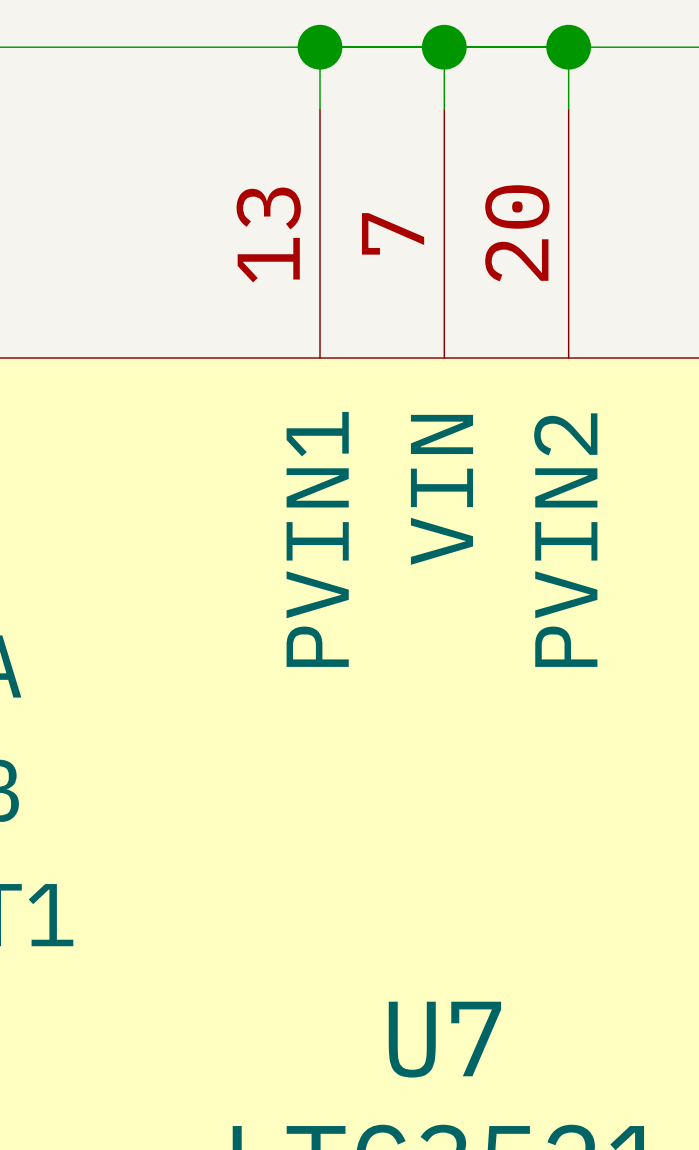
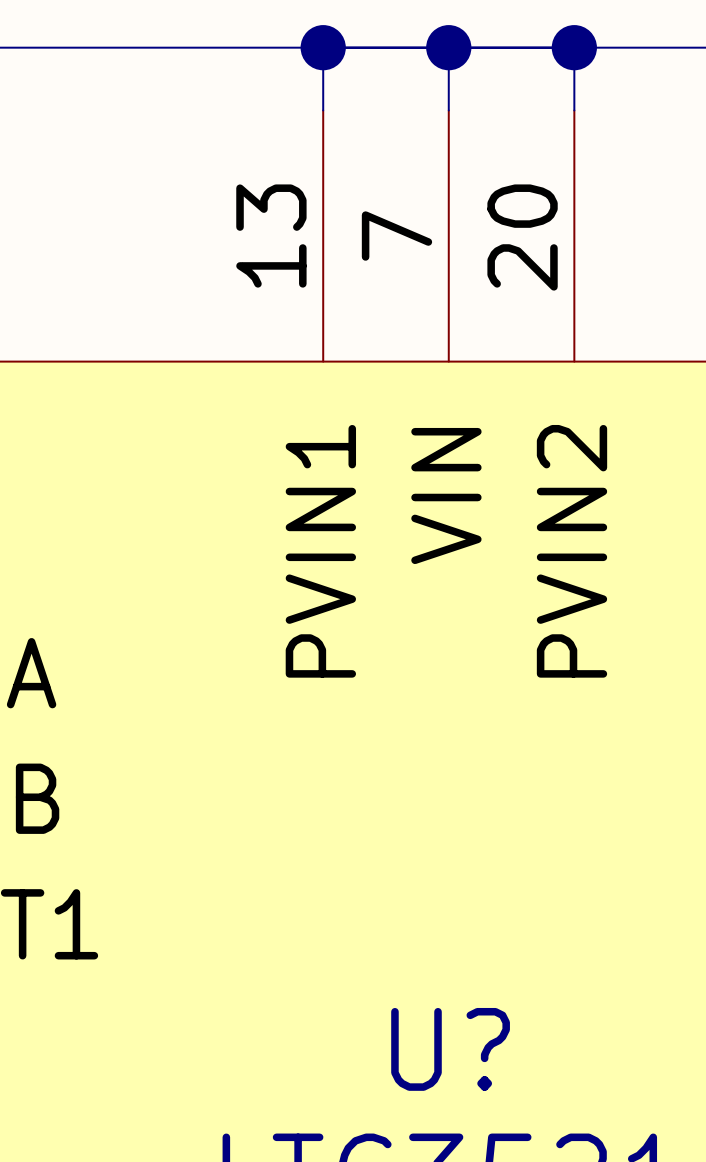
U7 name: U7 (444, 1039) -> U? (450, 1049)

